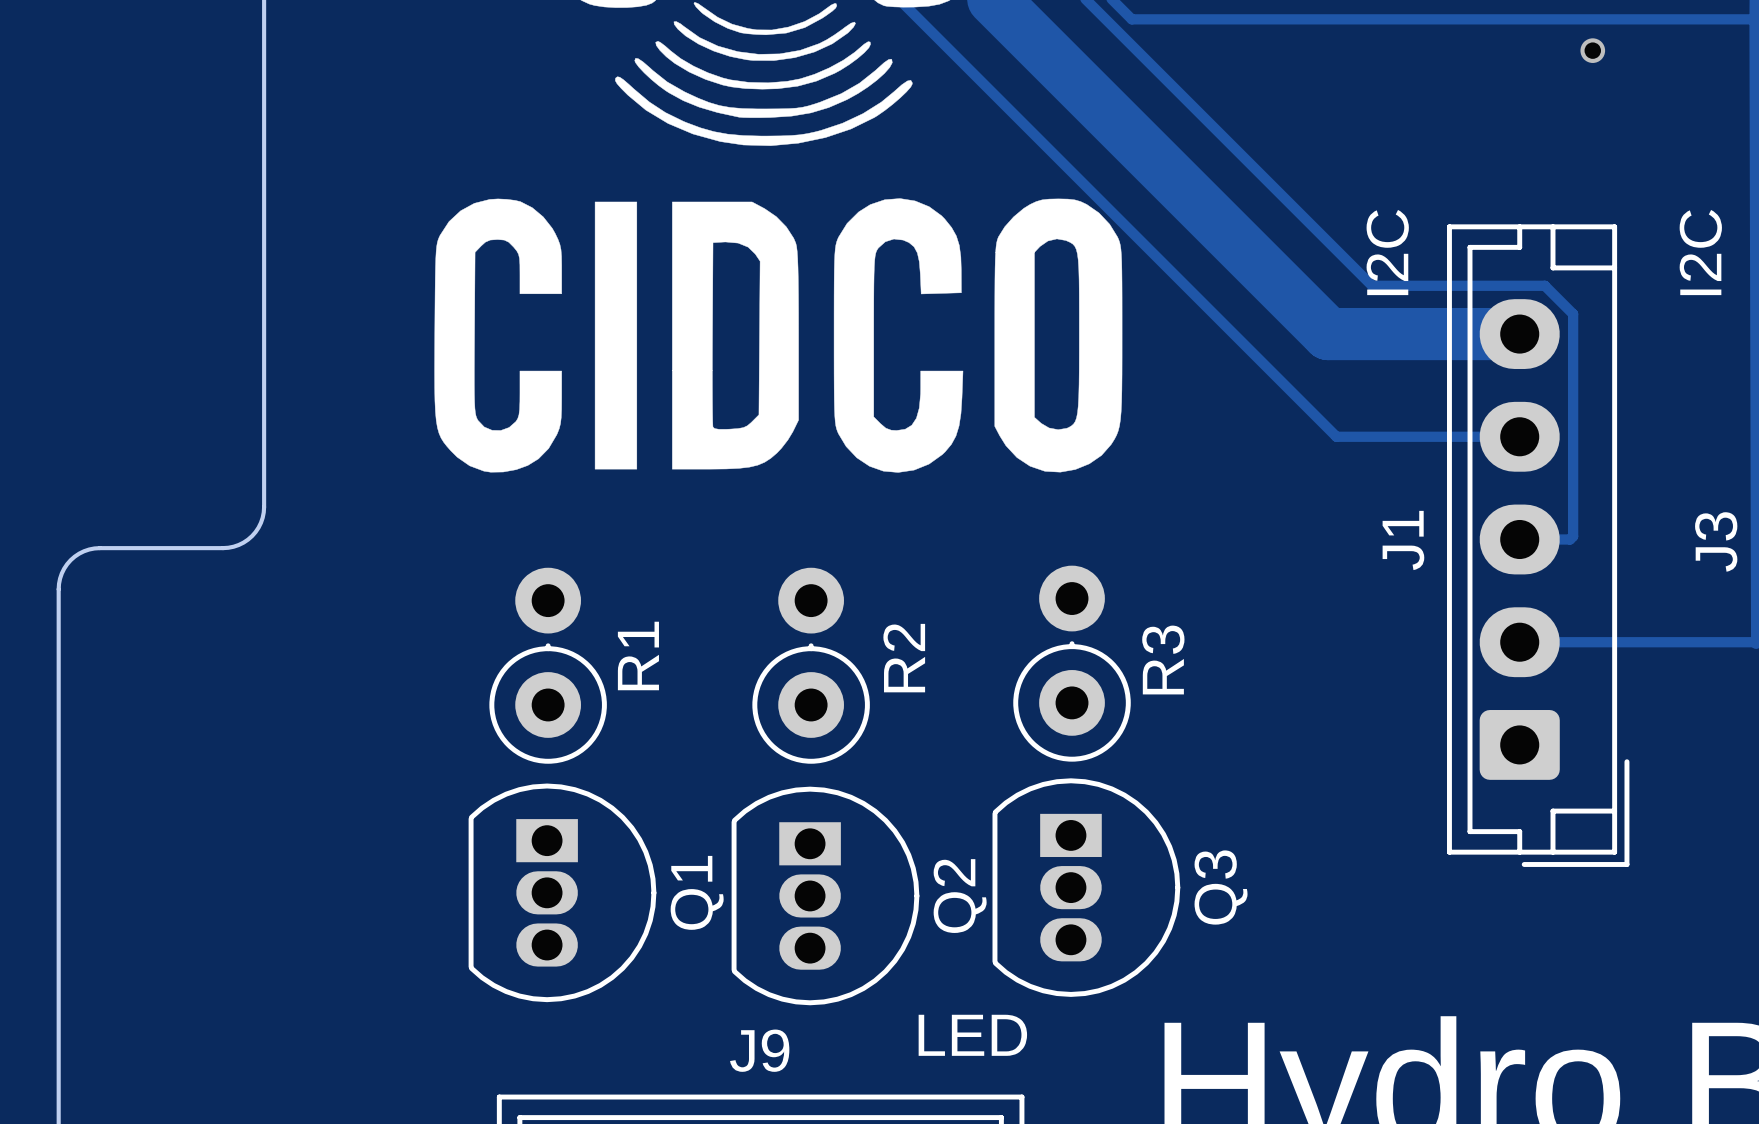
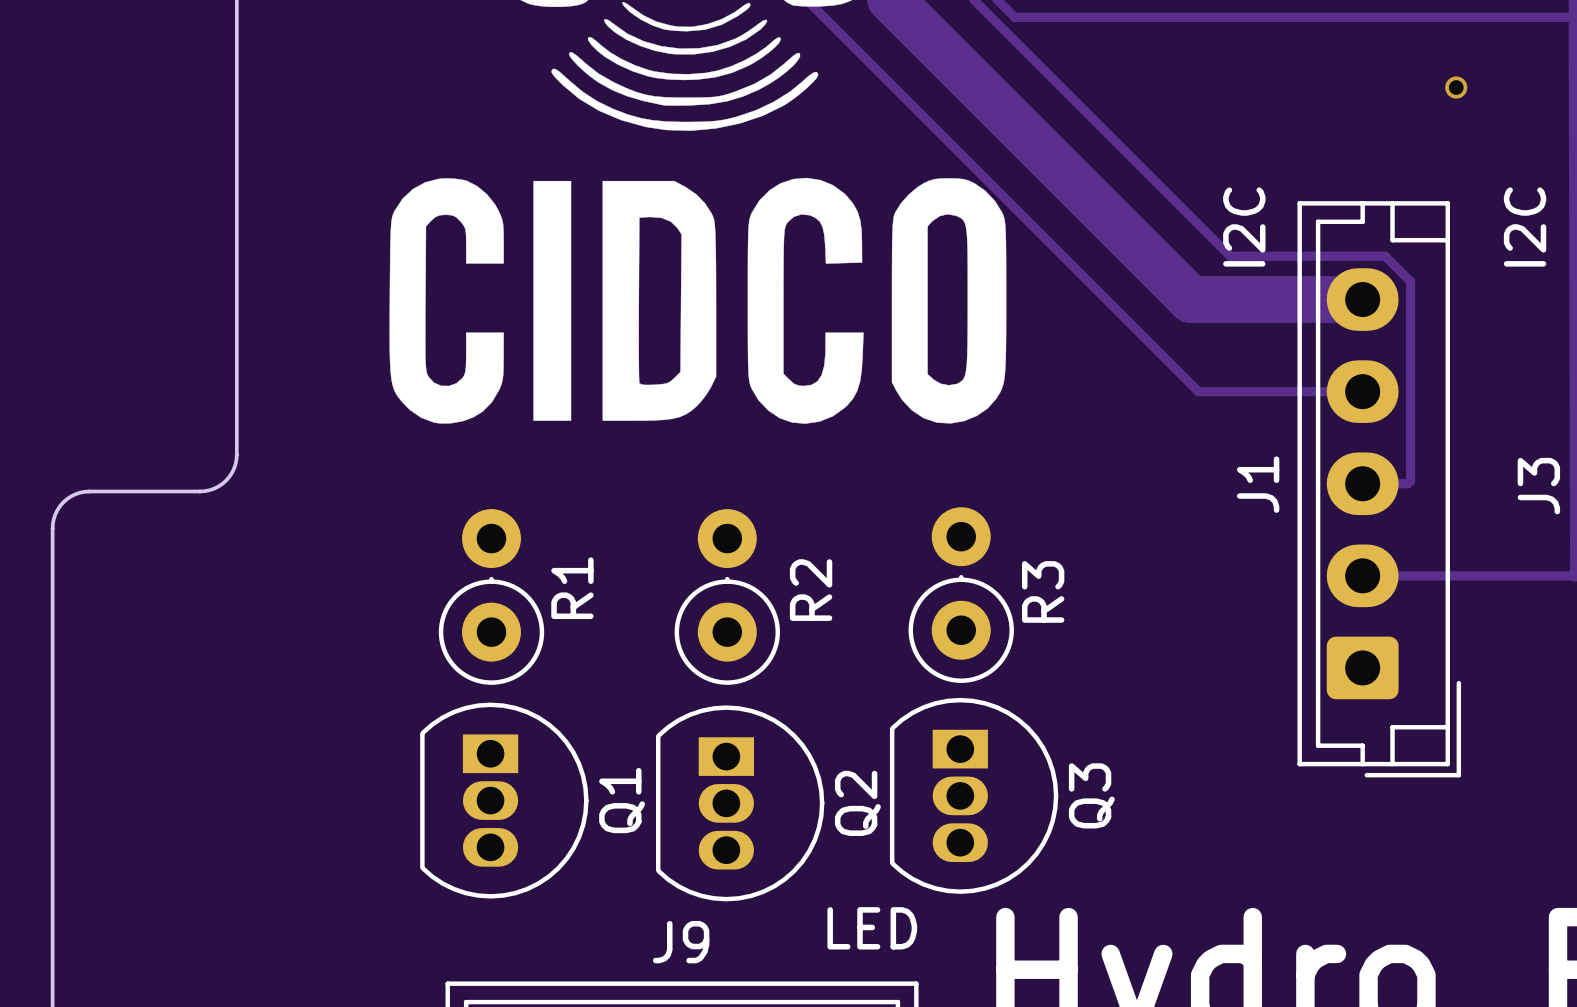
via: (1592, 50) -> none
via: none -> (1456, 87)

